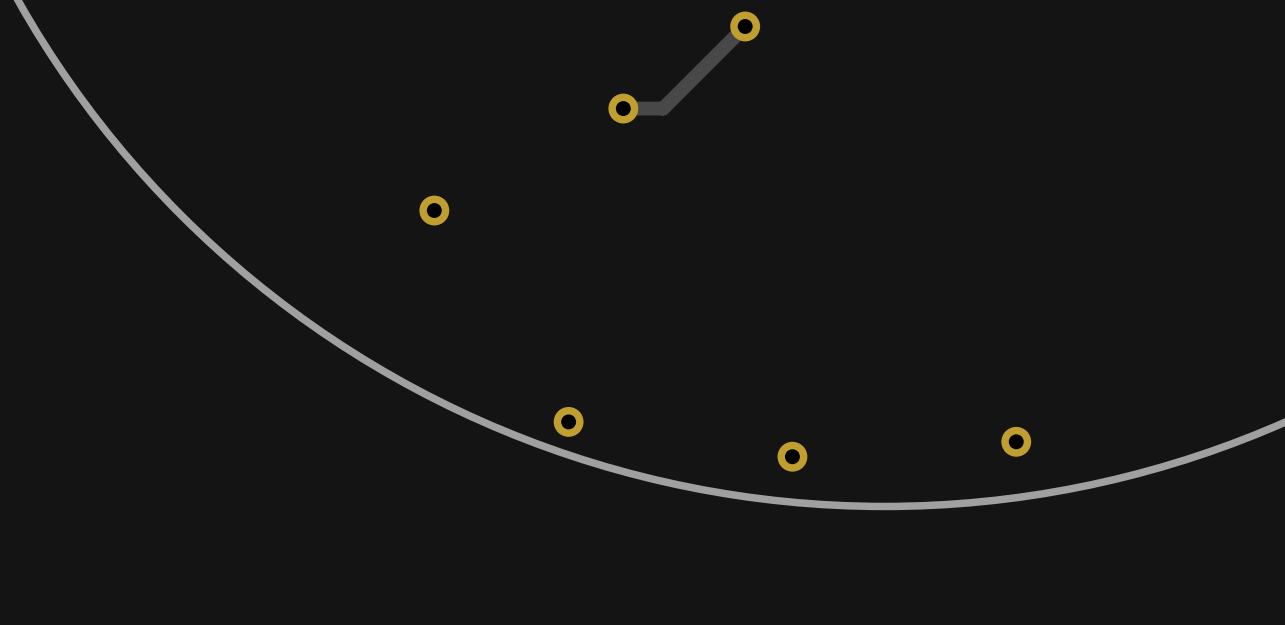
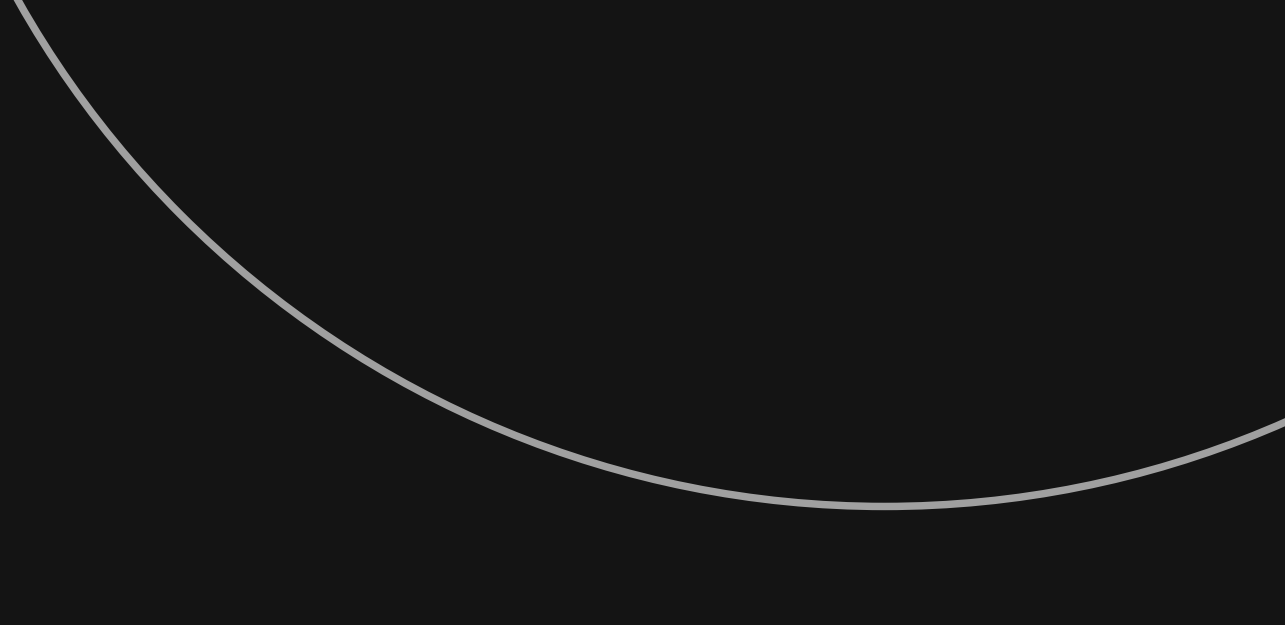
track: (745, 26) (663, 108) (623, 108) -> none
via: (745, 26) -> none
via: (623, 108) -> none
via: (434, 210) -> none
via: (568, 421) -> none
via: (1016, 441) -> none
via: (792, 456) -> none

